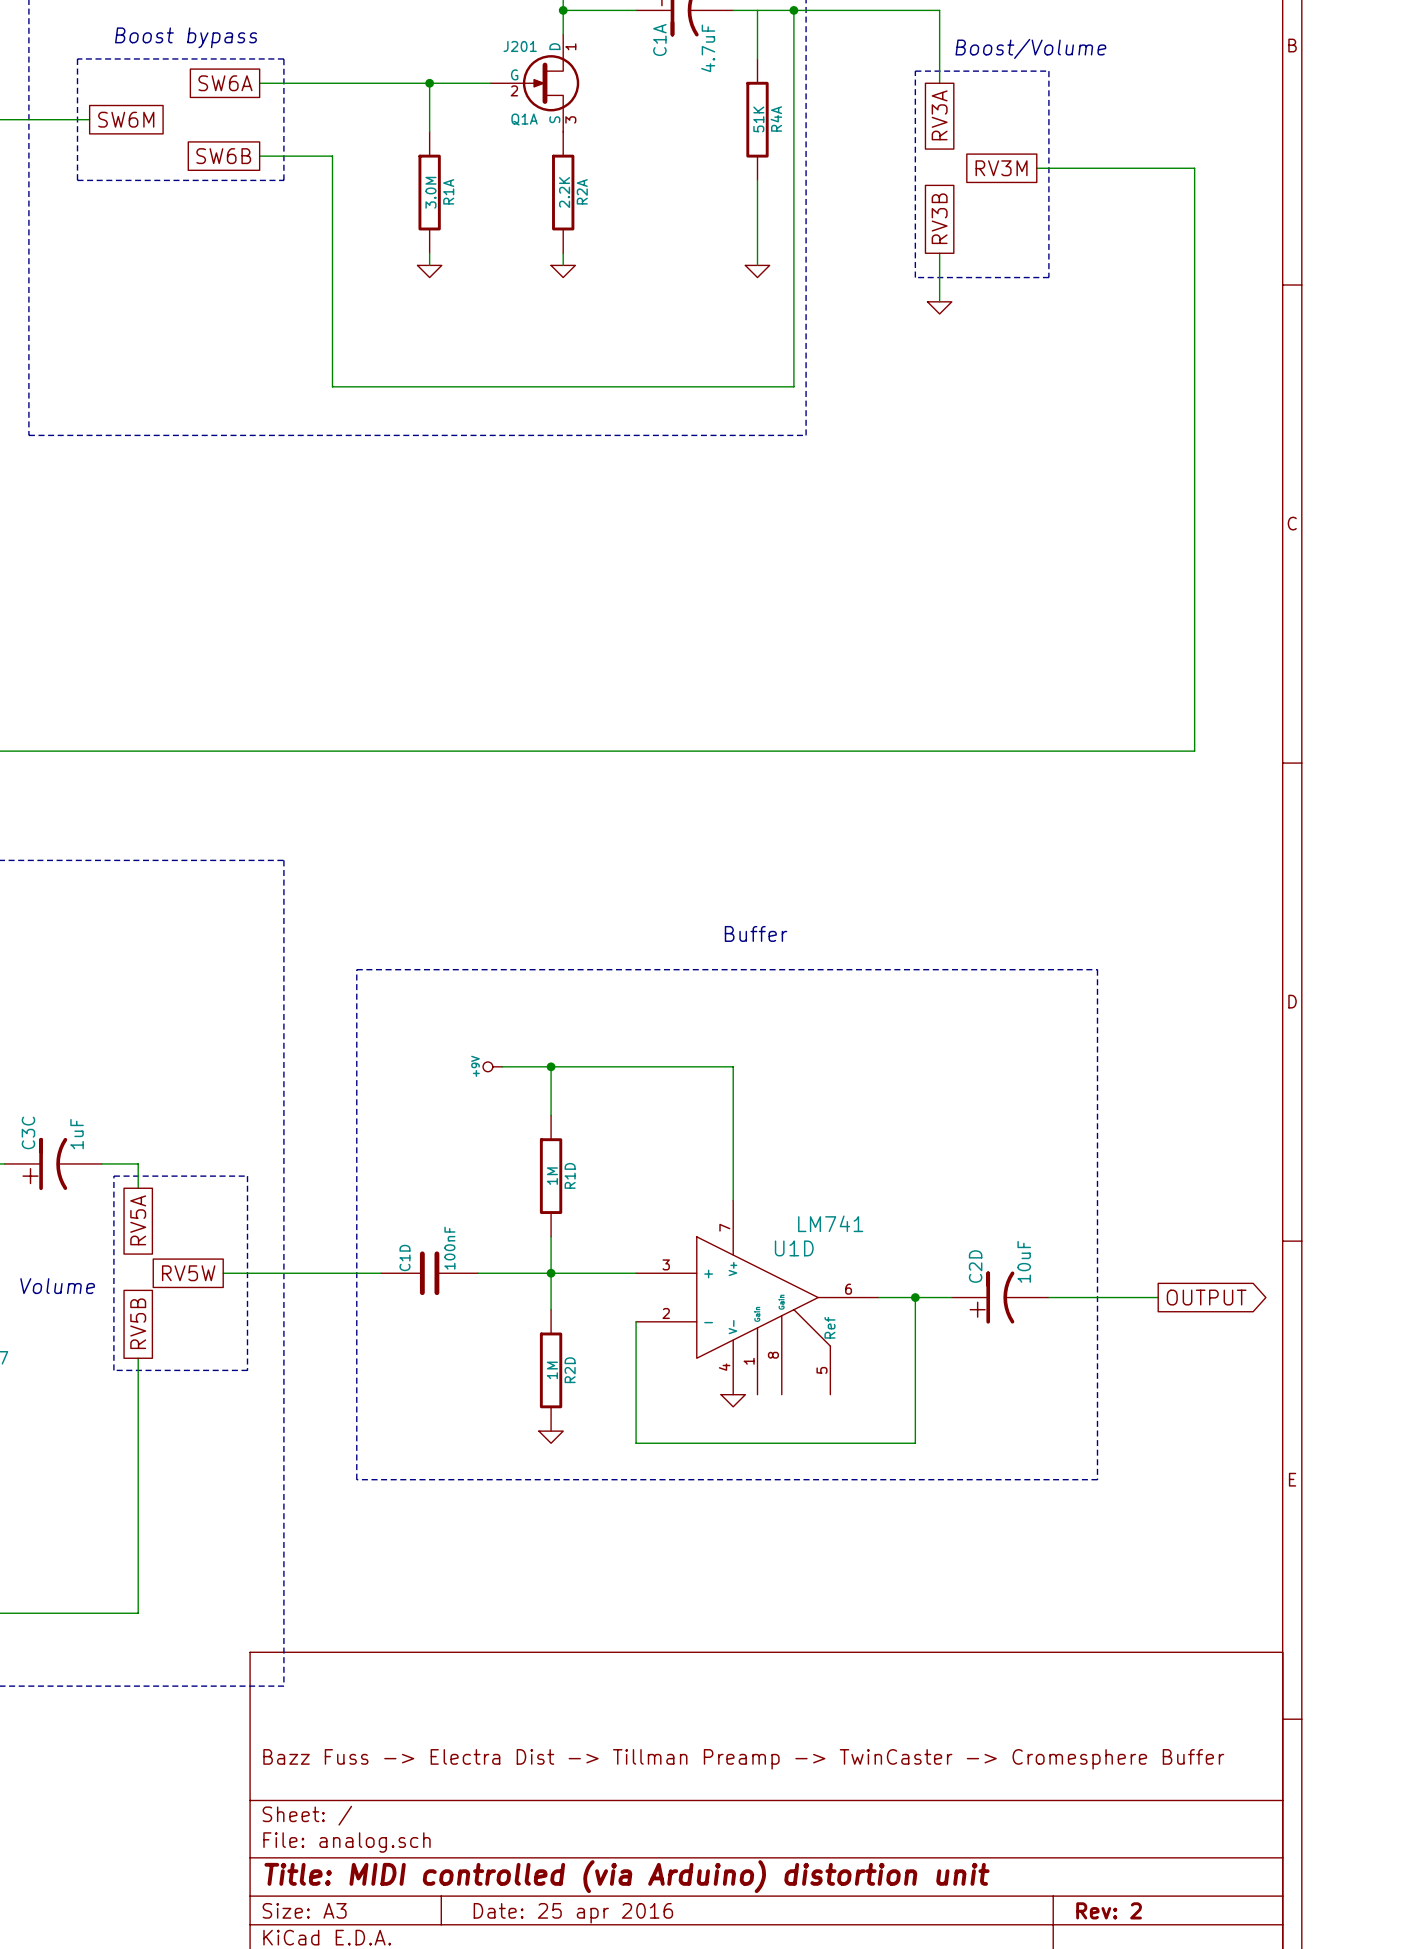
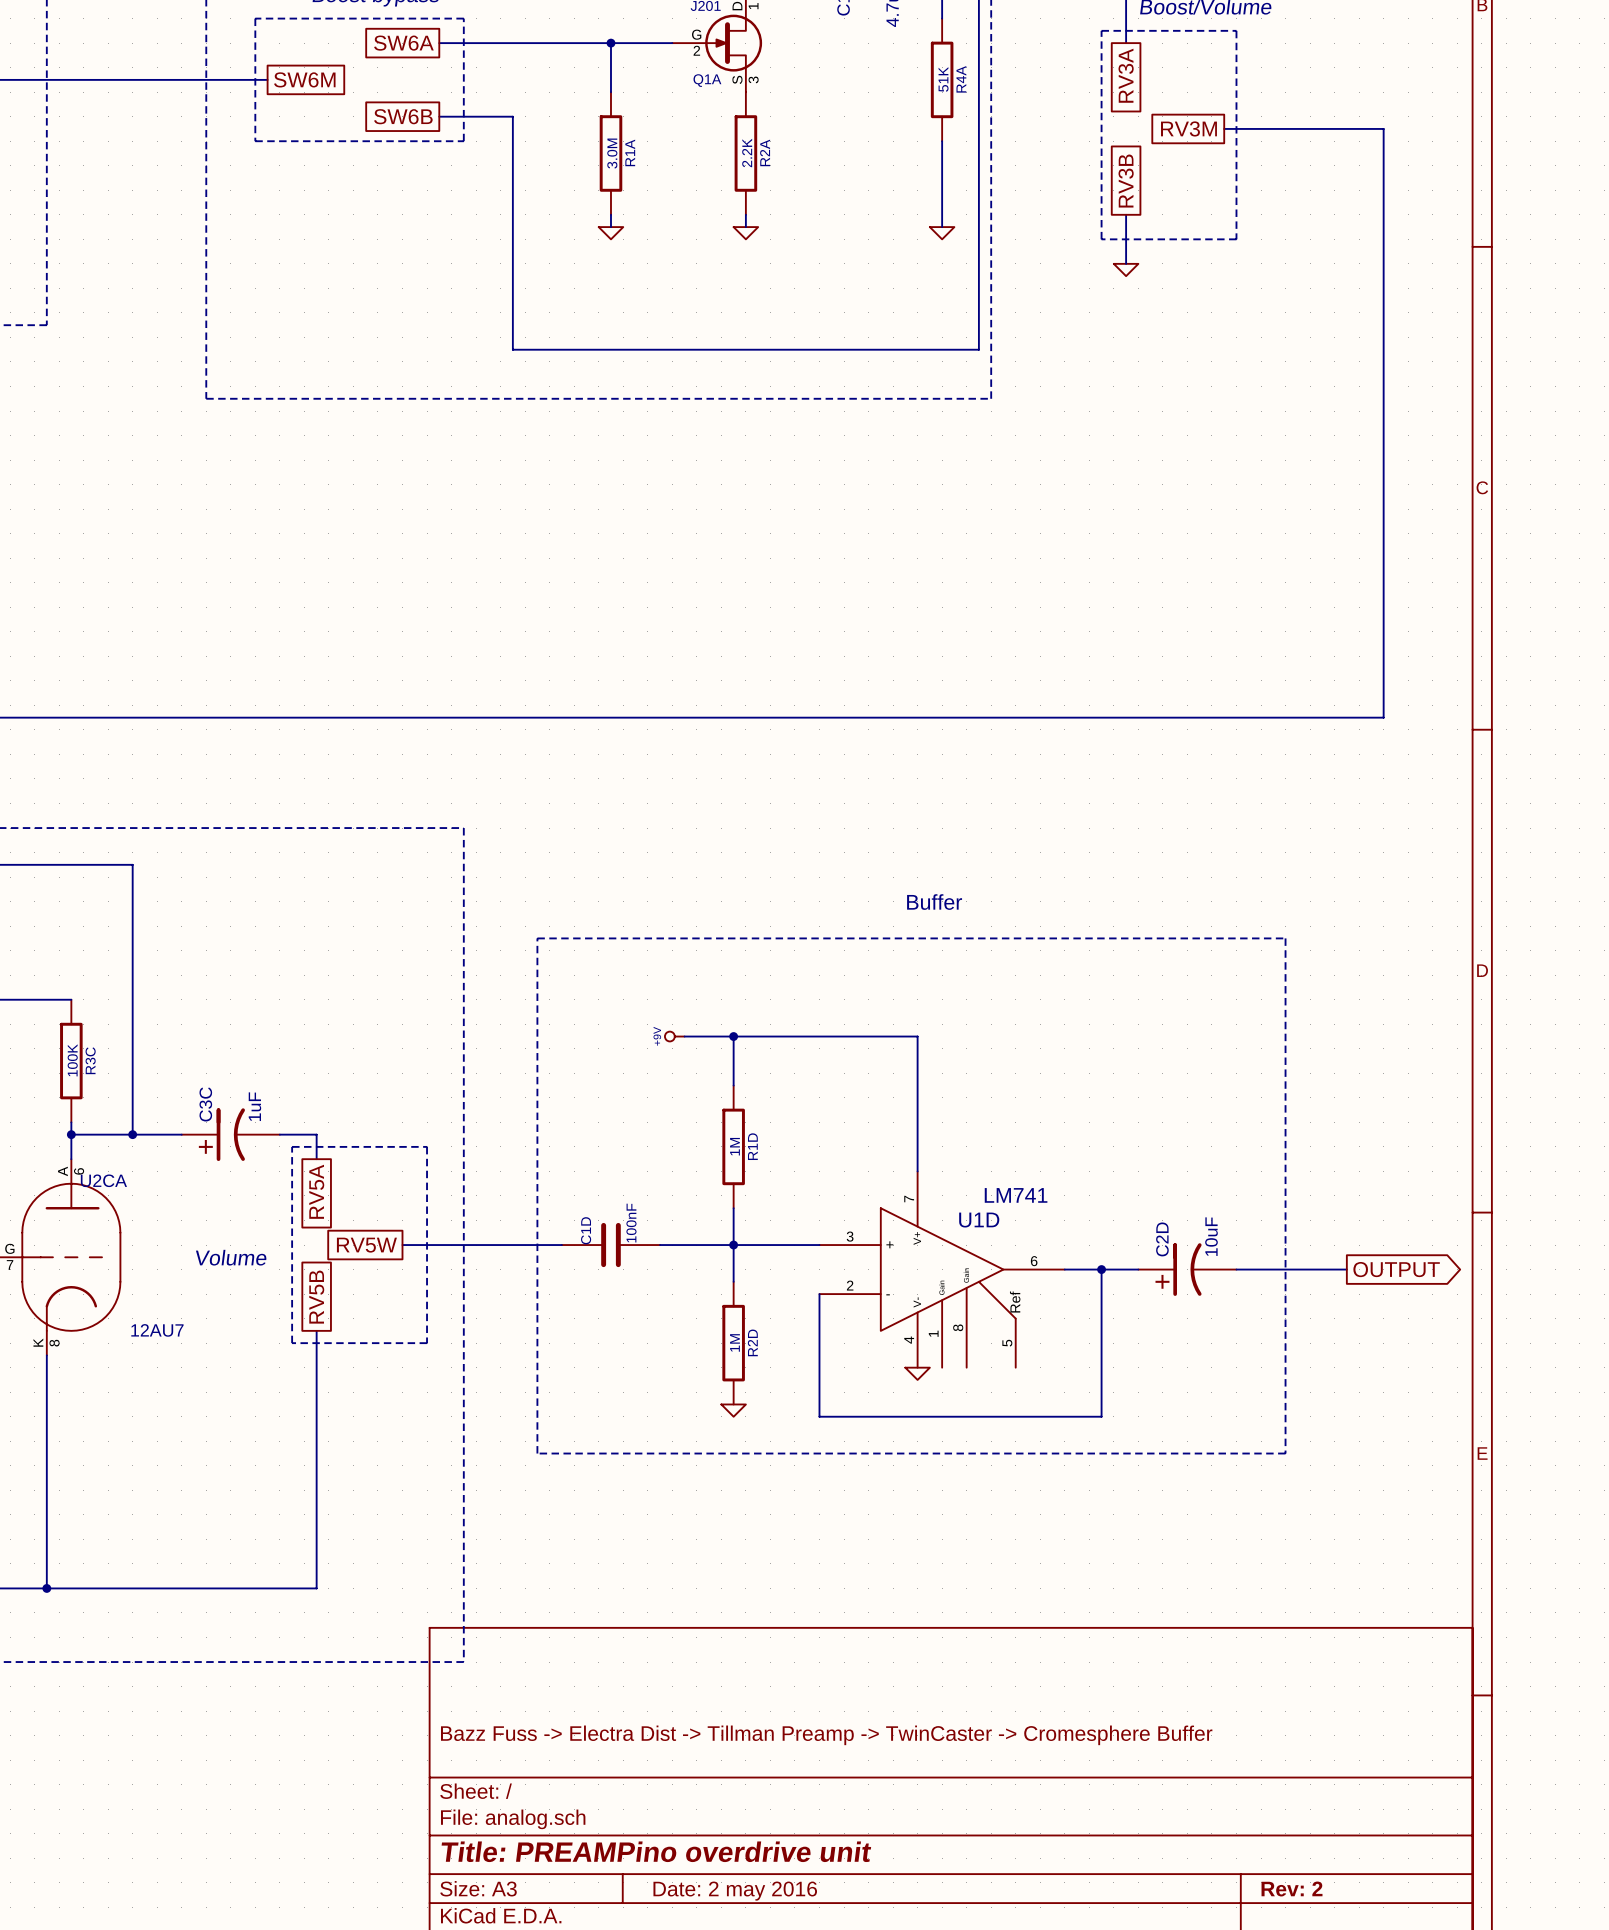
title block: Title: MIDI controlled (via Arduino) distortion unit (627, 1876) -> Title: PREAMPino overdrive unit (656, 1851)
title block: Date: 25 apr 2016 (573, 1913) -> Date: 2 may 2016 (735, 1891)

